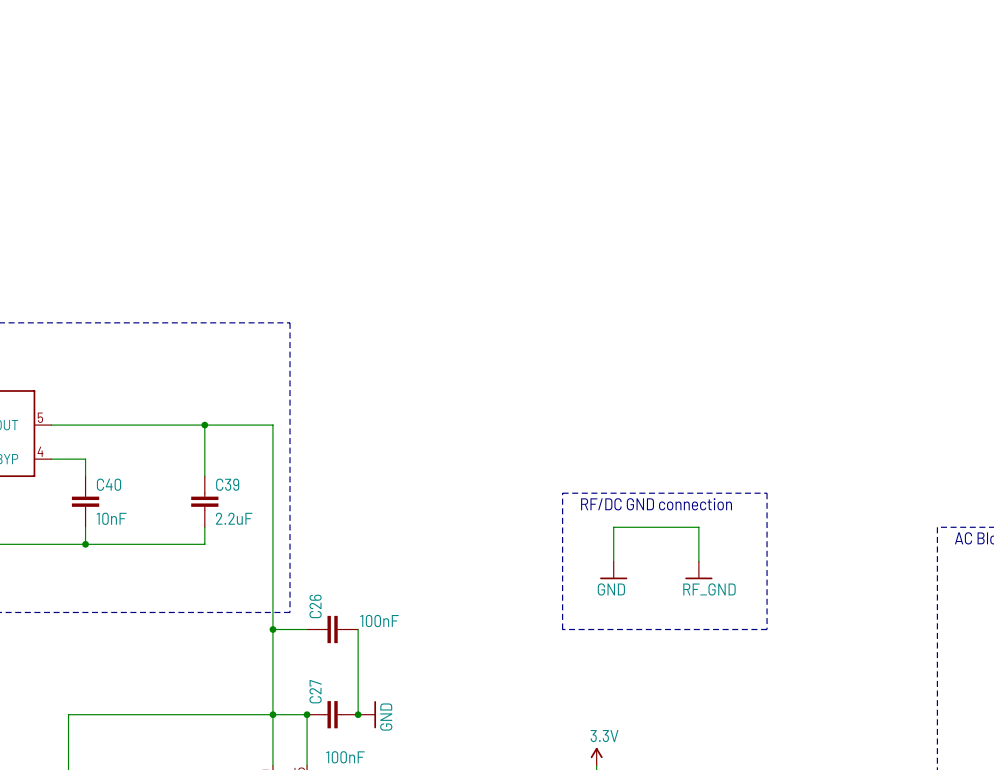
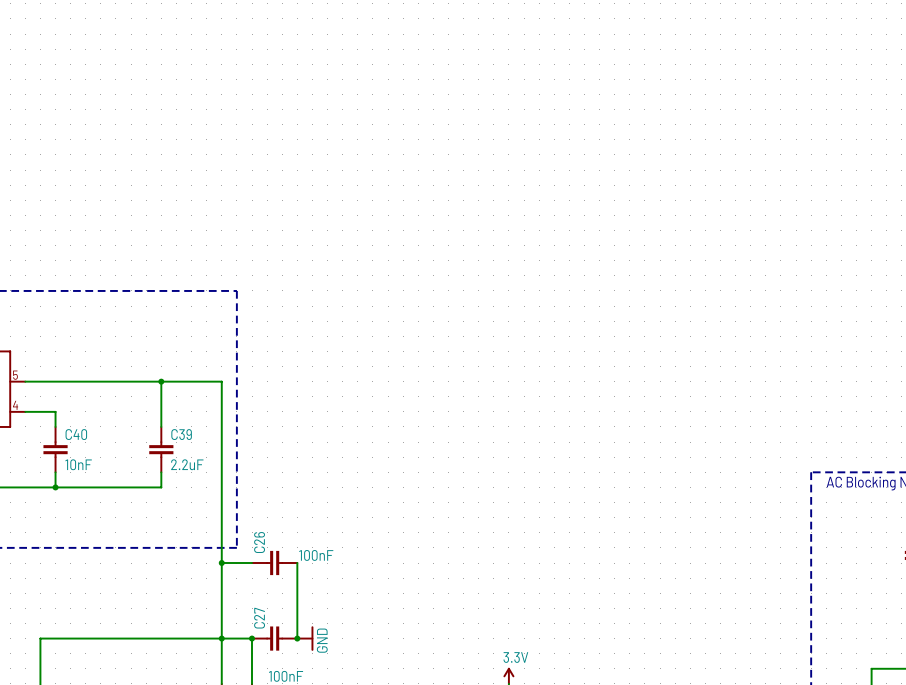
line: (562, 493) (767, 493) (767, 629) (562, 629) (562, 493) -> none
text: RF/DC GND connection (656, 504) -> none
wire: (613, 561) (613, 527) (698, 527) (698, 561) -> none
power symbol: GND (613, 570) -> none
power symbol: RF_GND (698, 570) -> none

